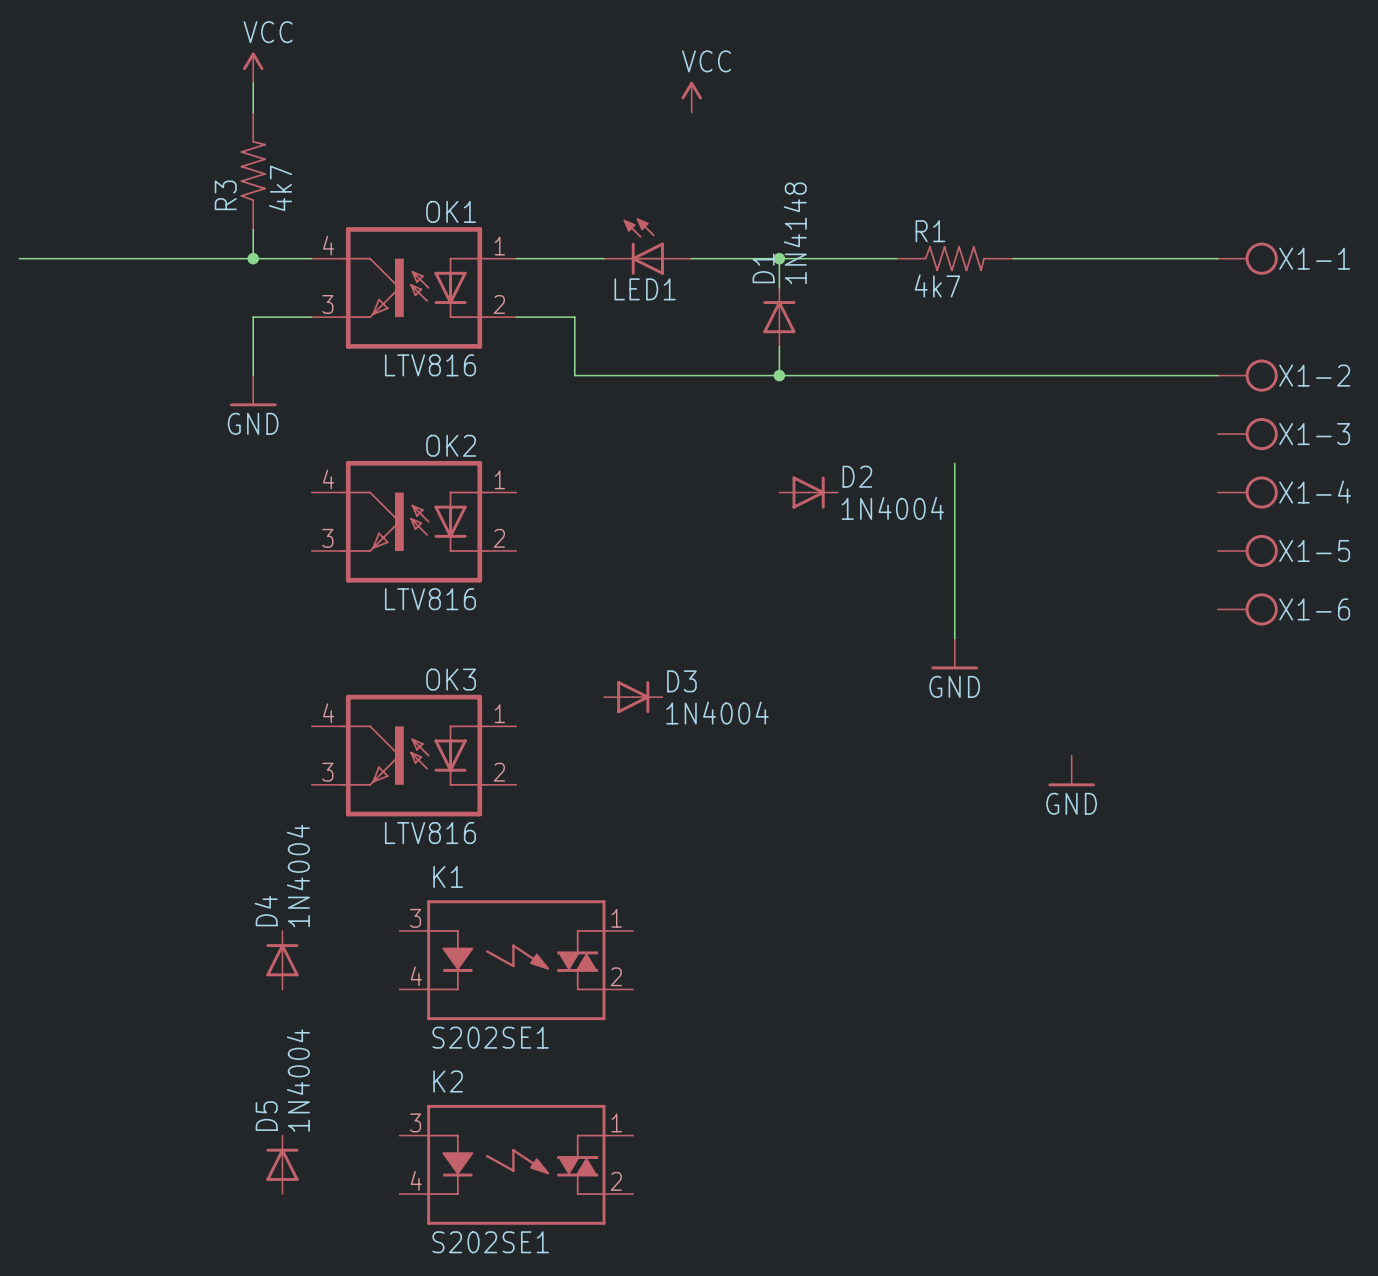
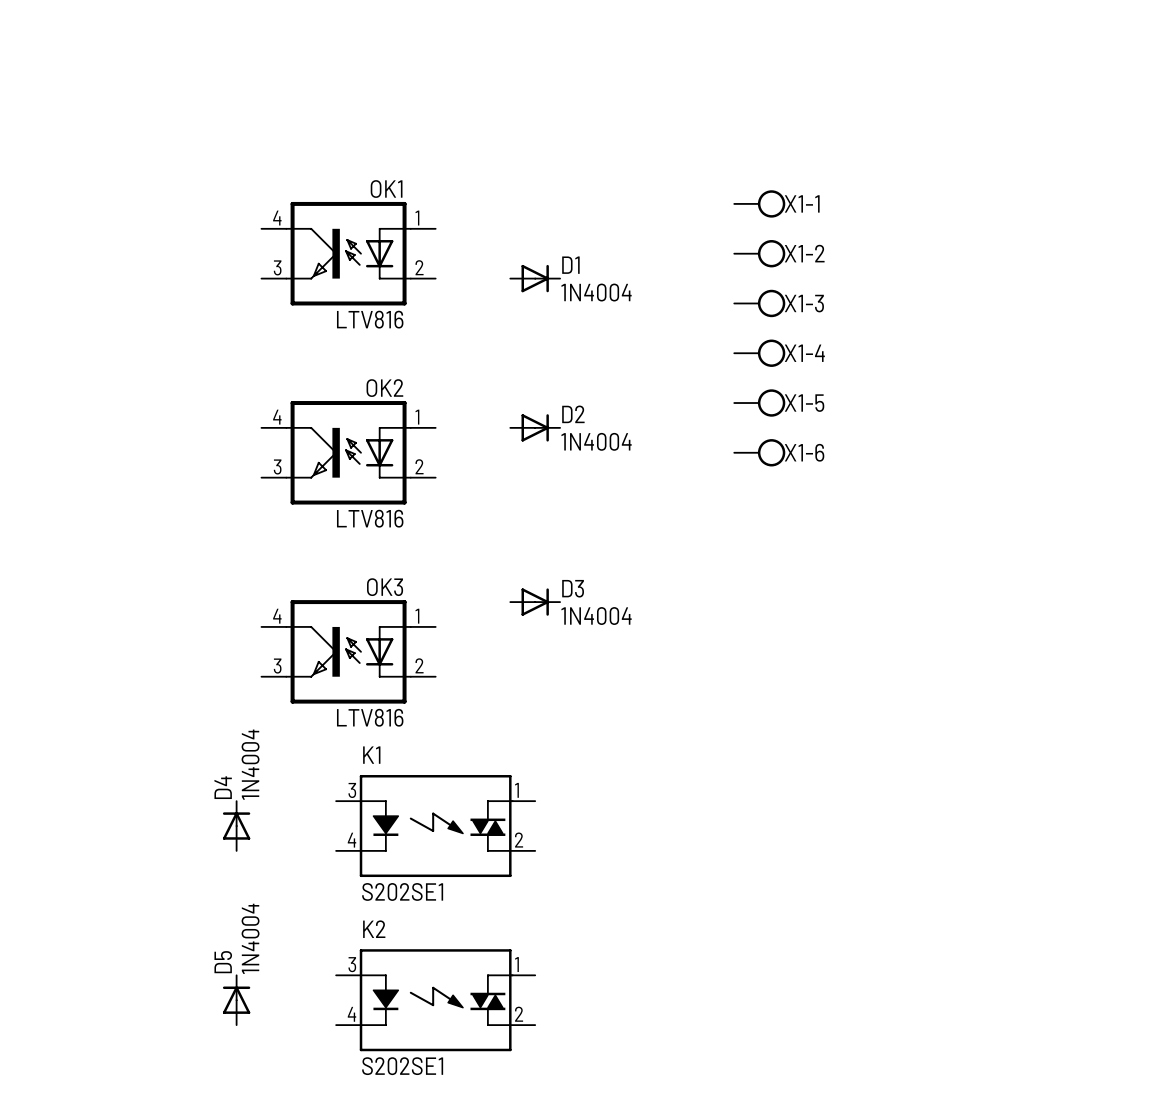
power symbol: VCC (253, 67) -> none
wire: (253, 83) (253, 112) -> none
power symbol: VCC (691, 97) -> none
R3: 4k7 (253, 170) -> none
wire: (253, 229) (253, 258) -> none
D1 value: 1N4148 (795, 233) -> 1N4004 (596, 292)
LED1: (647, 246) -> none
wire: (19, 258) (311, 258) -> none
junction: (253, 258) -> none
wire: (516, 258) (604, 258) -> none
wire: (691, 258) (896, 258) -> none
wire: (779, 258) (779, 287) -> none
junction: (779, 258) -> none
R1: 4k7 (954, 258) -> none
wire: (1013, 258) (1217, 258) -> none
X1-1 position: (1247, 258) -> (759, 203)
wire: (311, 317) (253, 317) (253, 375) -> none
wire: (516, 317) (574, 317) (574, 375) (1217, 375) -> none
D1 rotation: 0° (779, 317) -> 90° clockwise (535, 278)
D1 position: (779, 317) -> (535, 278)
wire: (779, 346) (779, 375) -> none
junction: (779, 375) -> none
X1-2 position: (1247, 375) -> (759, 253)
power symbol: GND (253, 390) -> none
X1-3 position: (1247, 434) -> (759, 303)
wire: (954, 463) (954, 638) -> none
D2 position: (808, 492) -> (535, 427)
X1-4 position: (1247, 492) -> (759, 353)
X1-5 position: (1247, 550) -> (759, 403)
X1-6 position: (1247, 609) -> (759, 452)
power symbol: GND (954, 654) -> none
power symbol: GND (1071, 770) -> none

